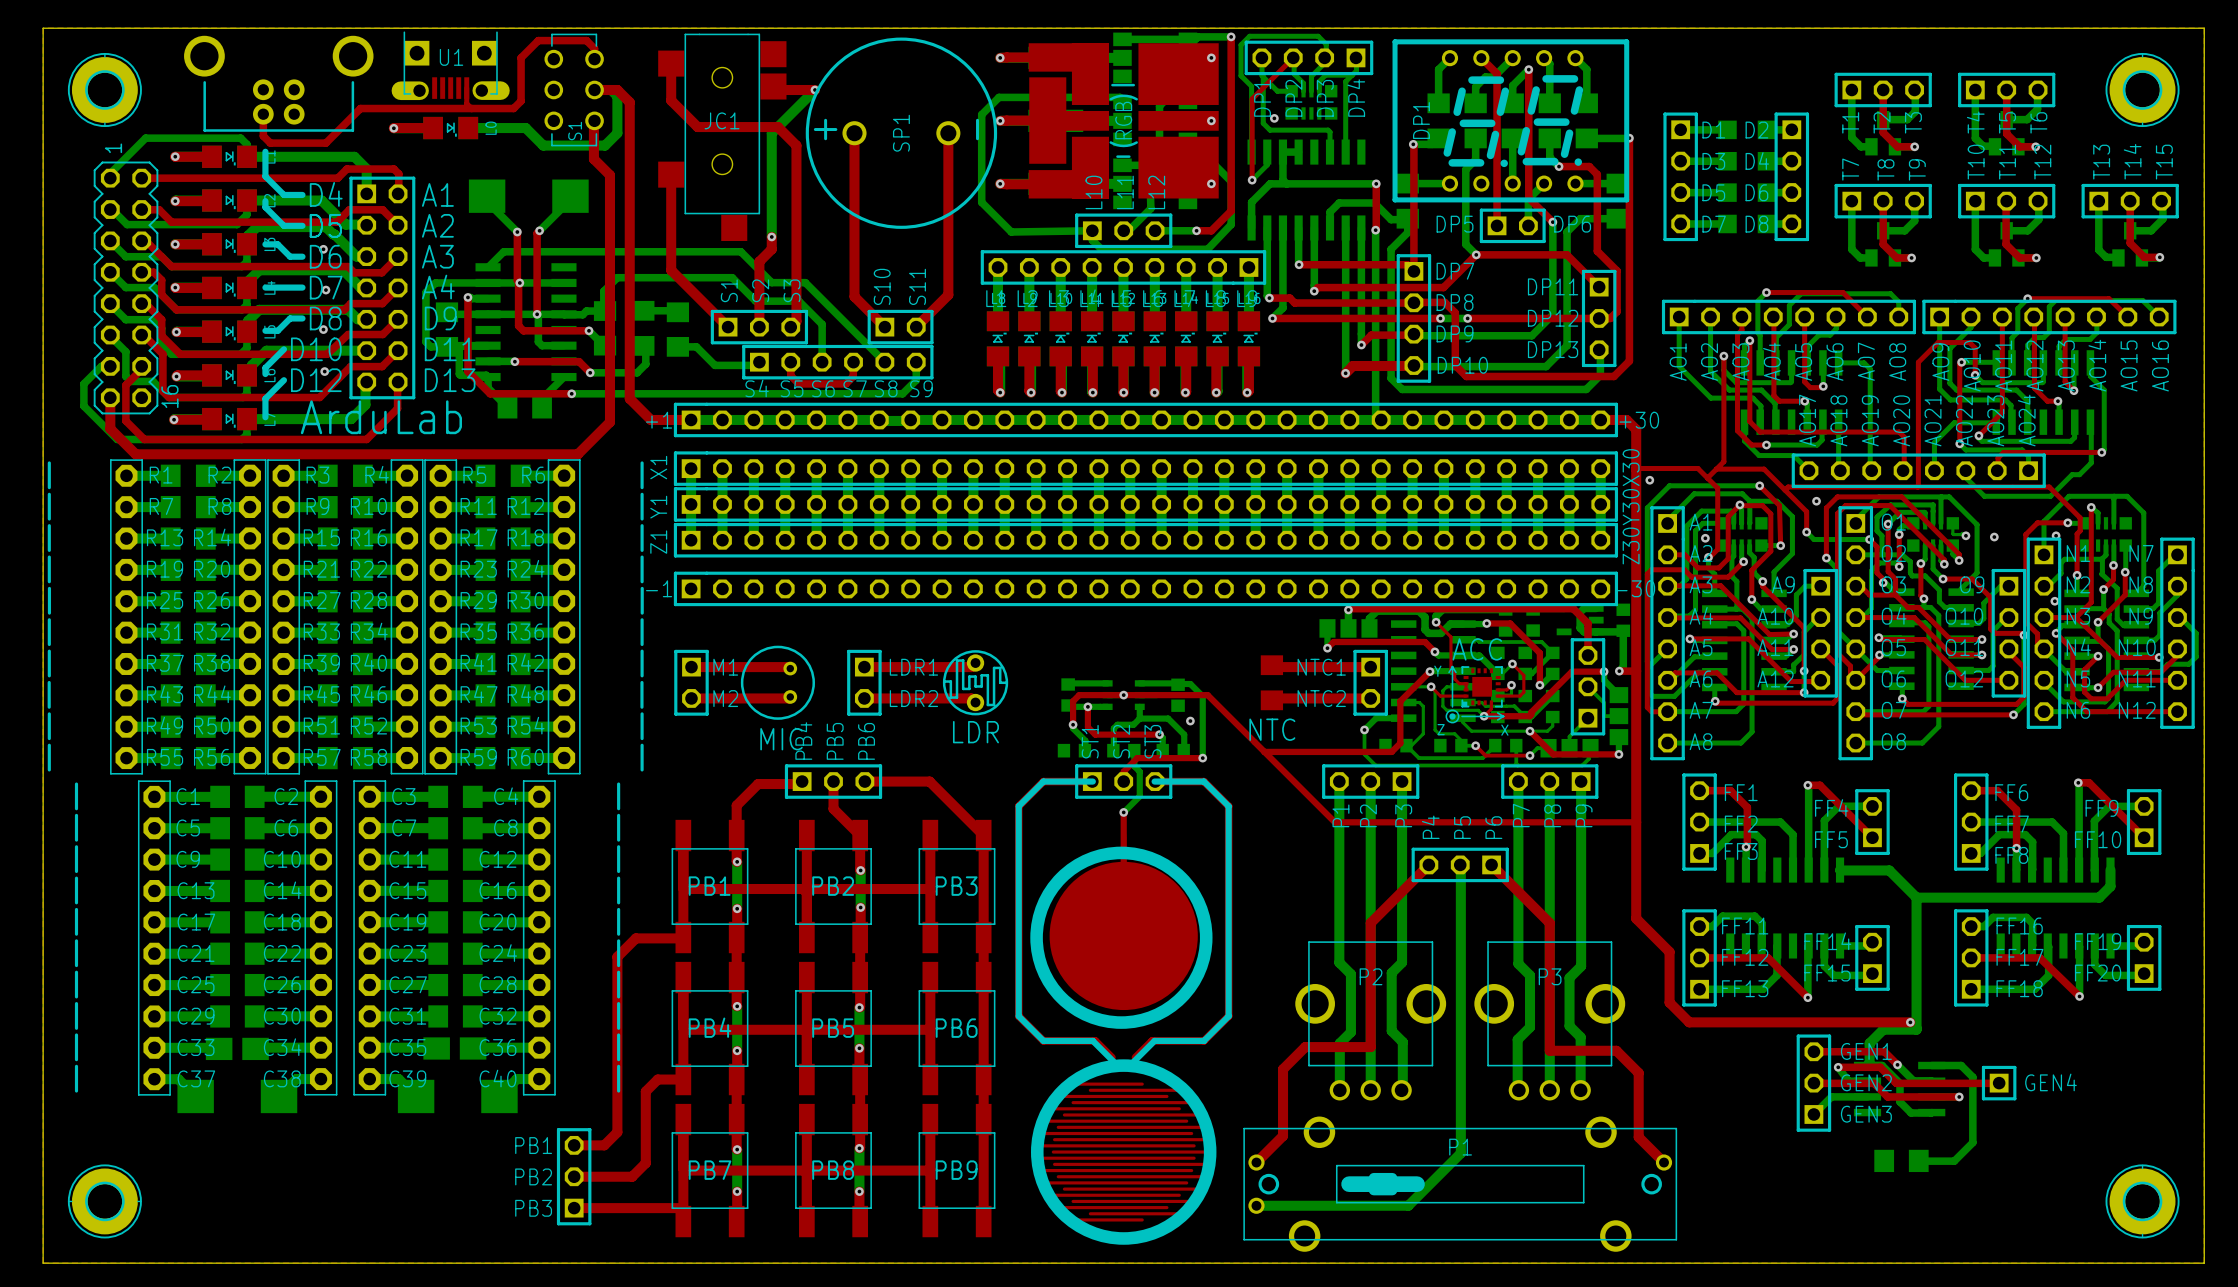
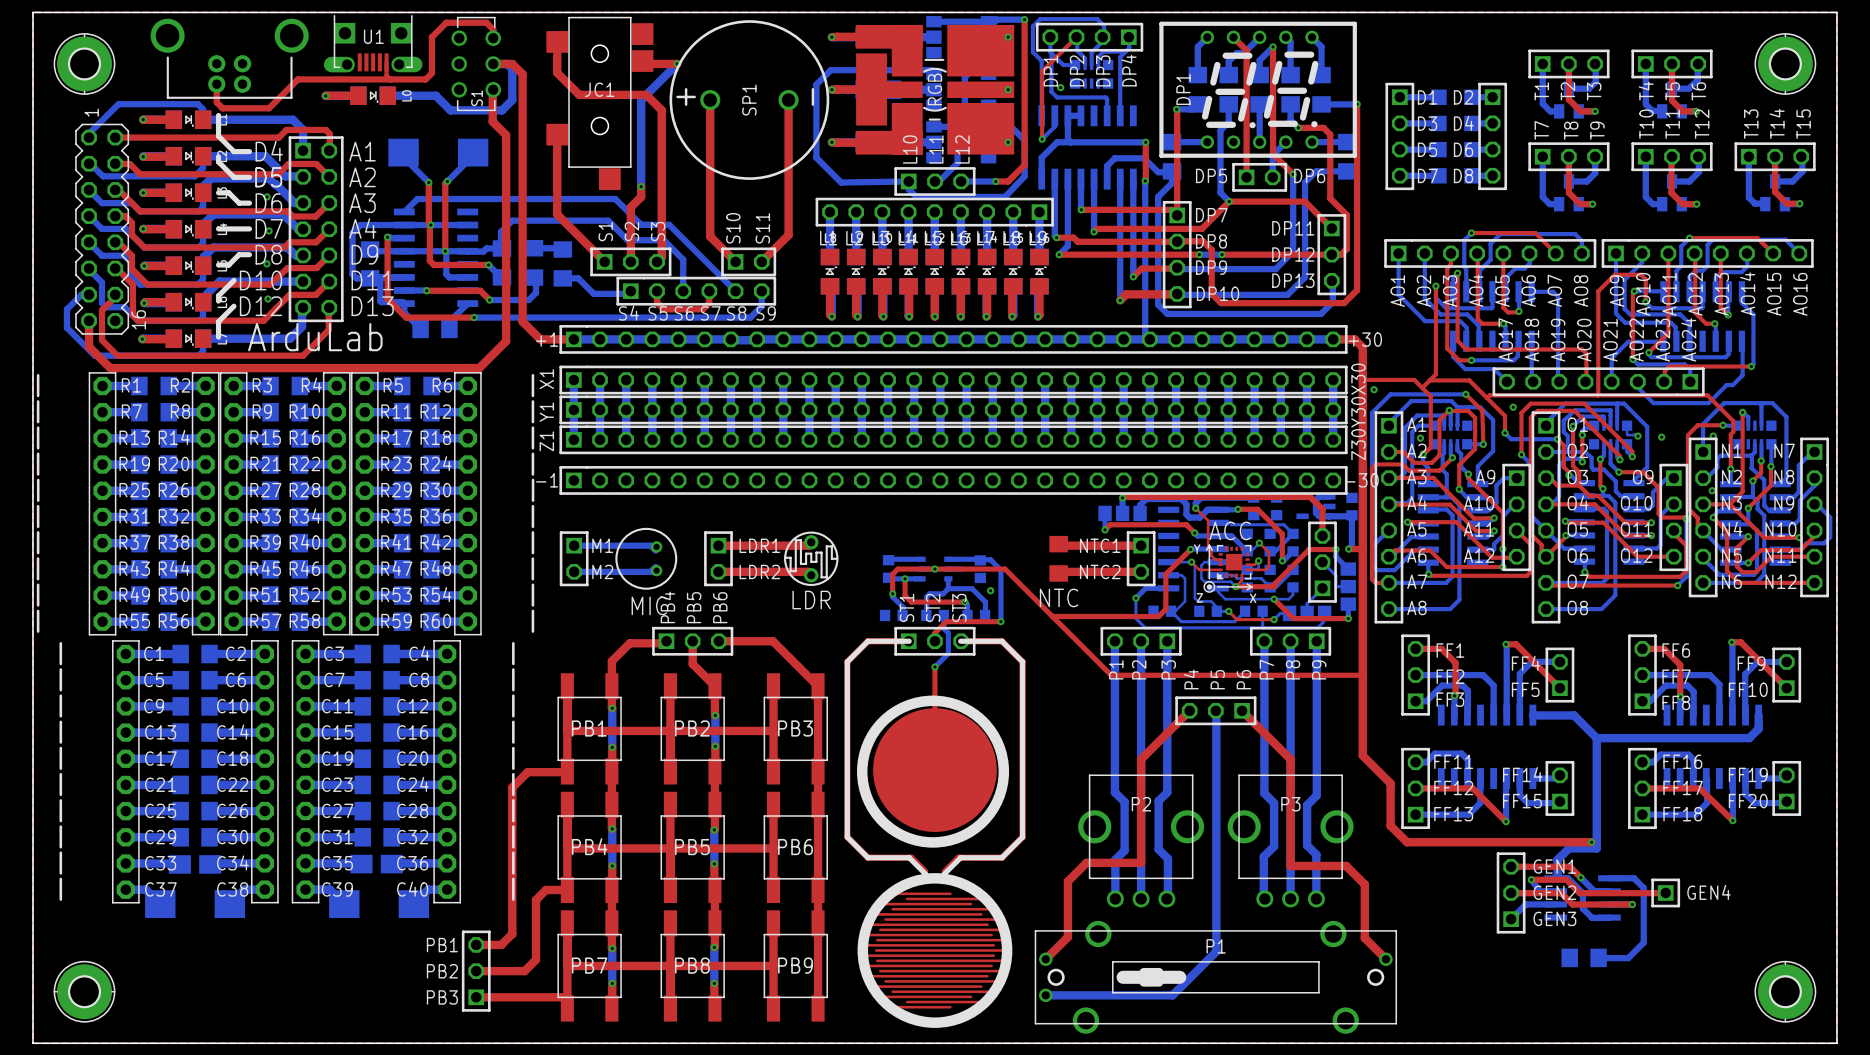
bottom track: none -> (574, 545) (650, 545) (655, 550)
top track: (691, 667) (790, 668) -> none
bottom track: none -> (655, 567) (650, 571) (574, 571)
top track: (790, 696) (691, 698) -> none

